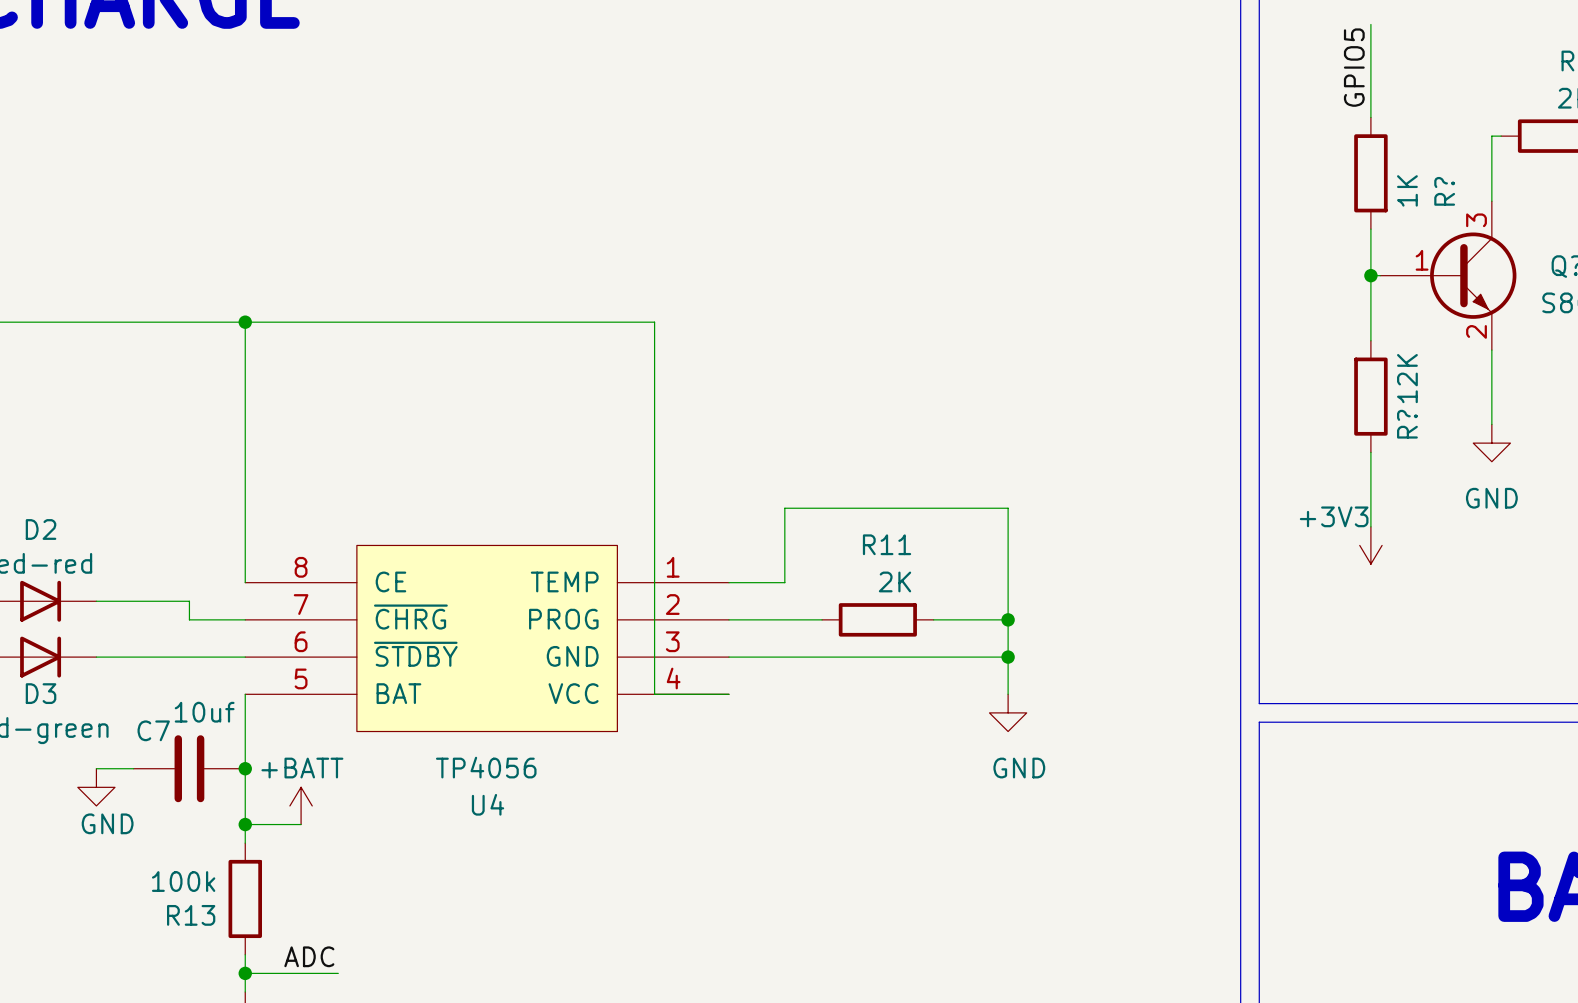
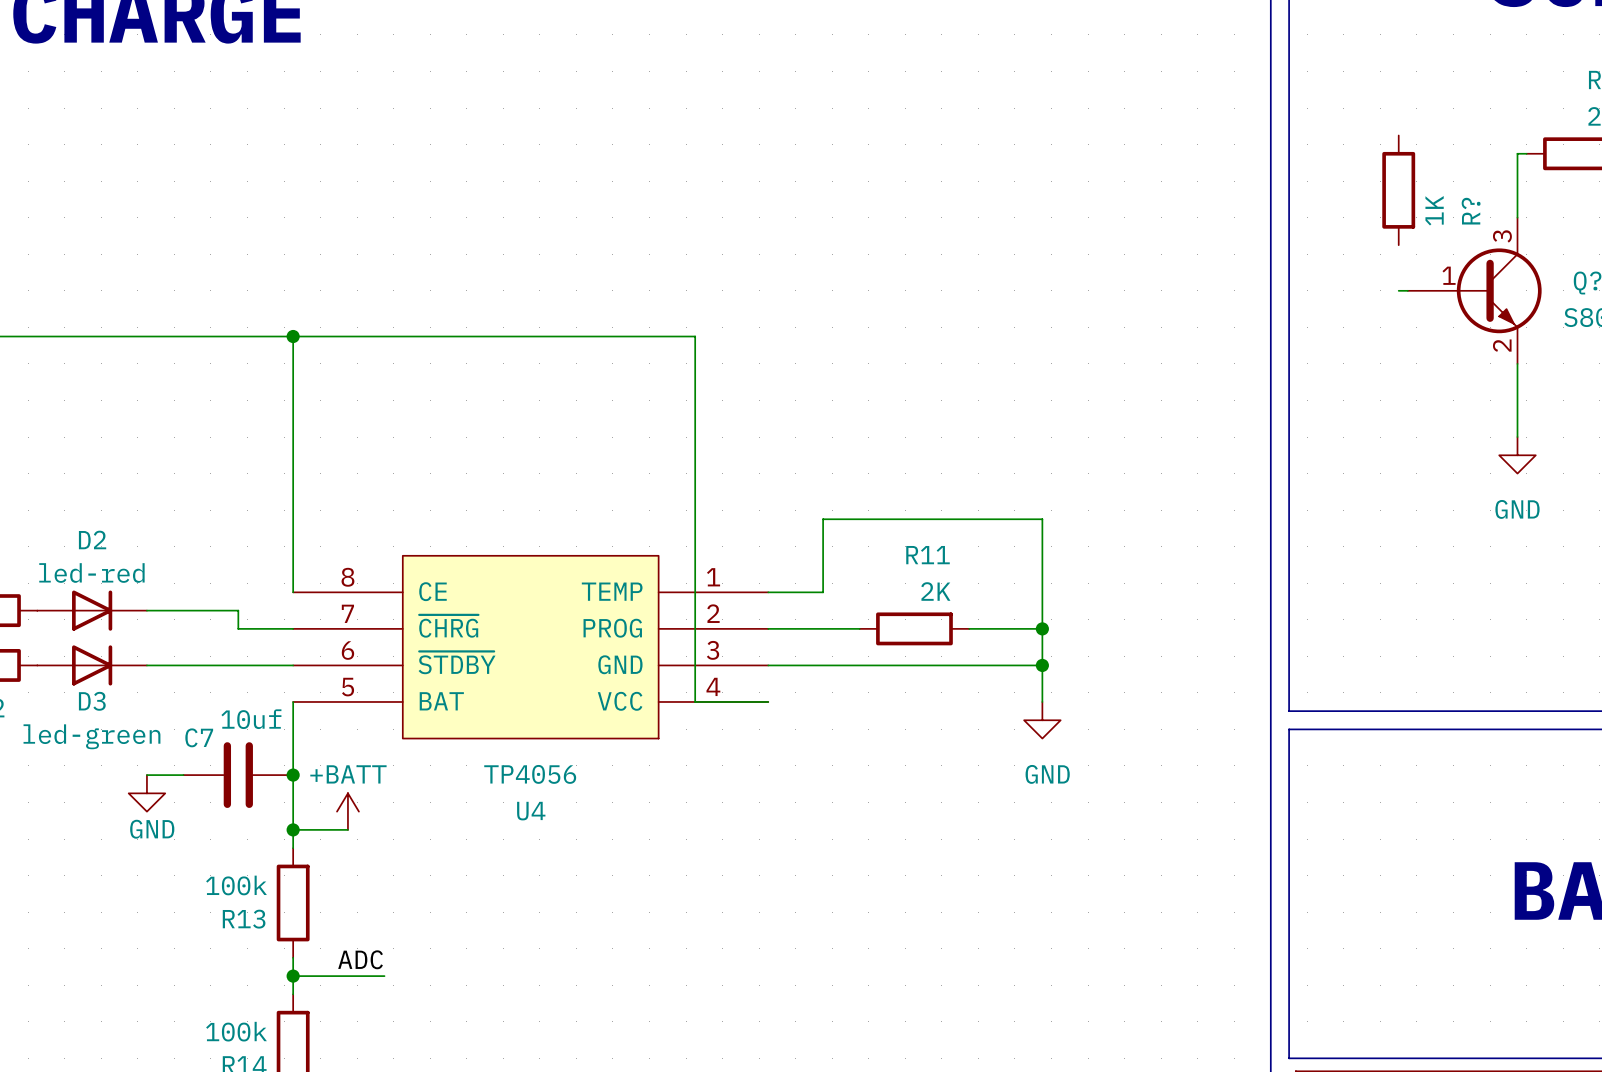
wire: (1370, 24) (1370, 117) -> none
label: GPIO5 (1354, 67) -> none
wire: (1370, 229) (1370, 340) -> none
junction: (1370, 275) -> none
R?: 12K (1370, 396) -> none
wire: (1370, 452) (1370, 526) -> none
power symbol: +3V3 (1370, 545) -> none

